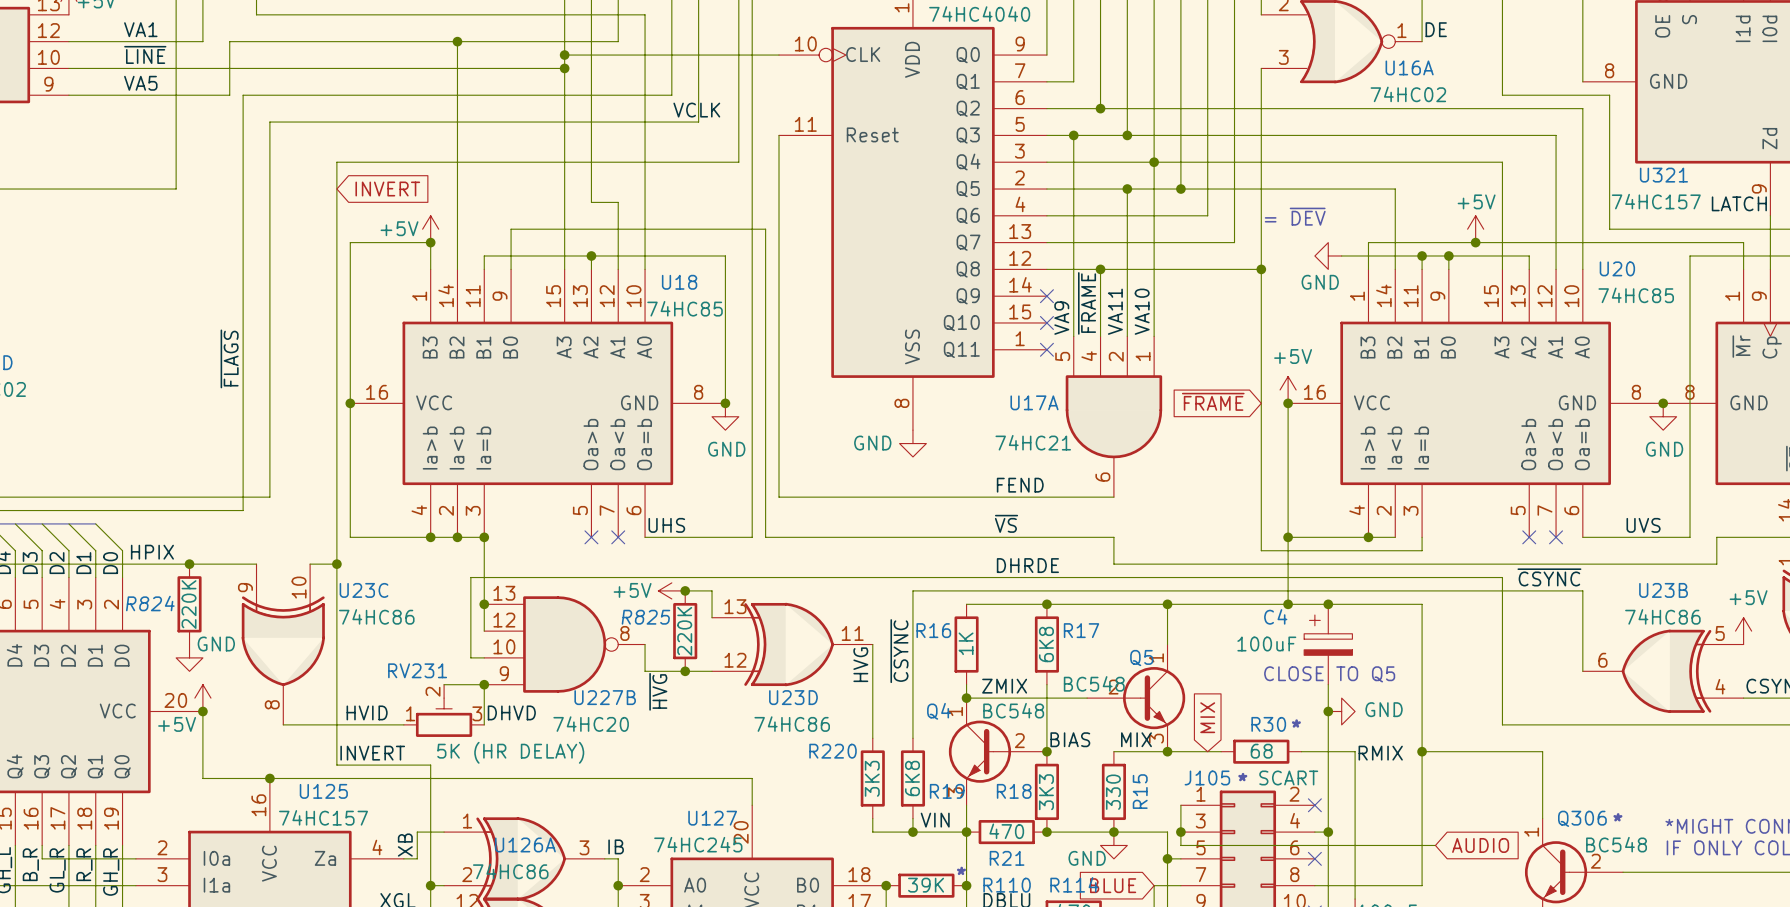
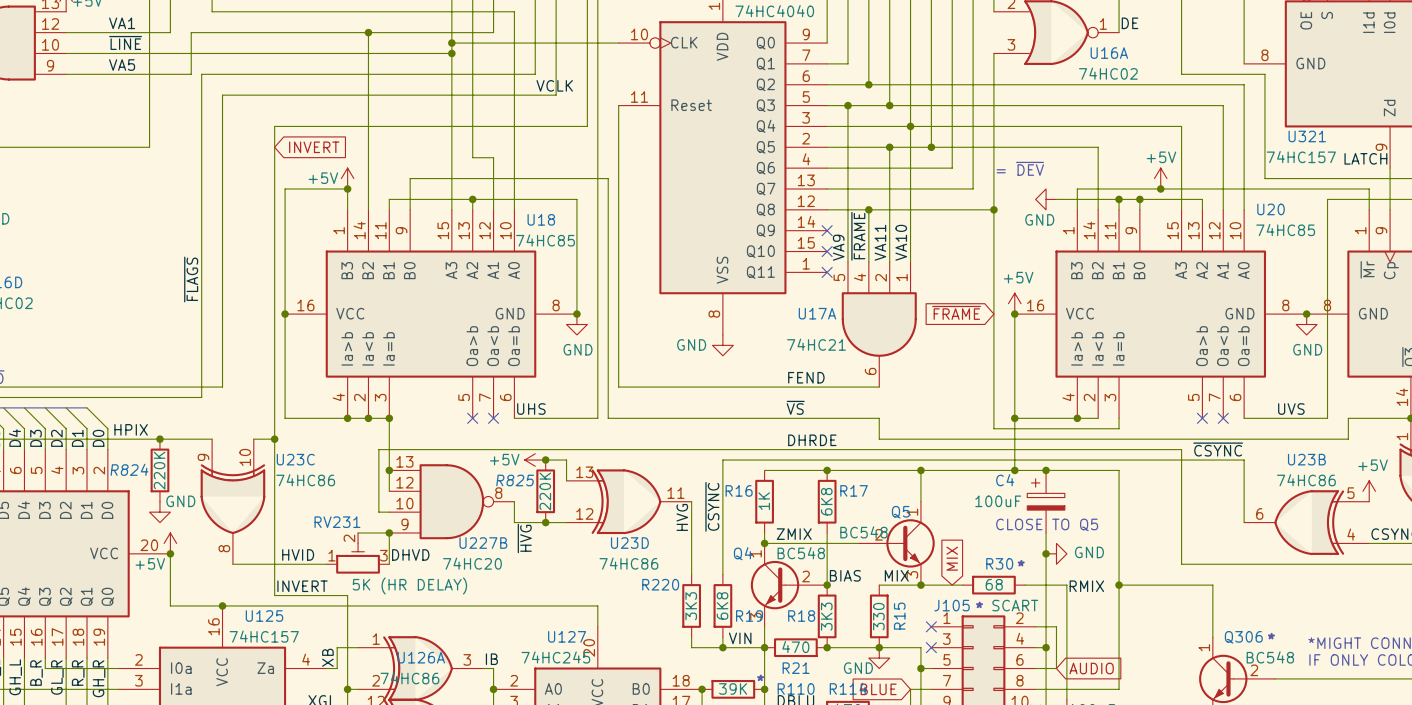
wire: (1180, 805) (1180, 845) (1435, 845) -> none
no-connect mark: none -> (931, 626)
wire: none -> (1035, 626) (1056, 626) (1056, 668) (1035, 668)
no-connect mark: (1314, 805) -> none
no-connect mark: none -> (931, 647)
junction: (1180, 832) -> none
global label position: AUDIO (1480, 845) -> AUDIO (1091, 668)
no-connect mark: (1314, 858) -> none

